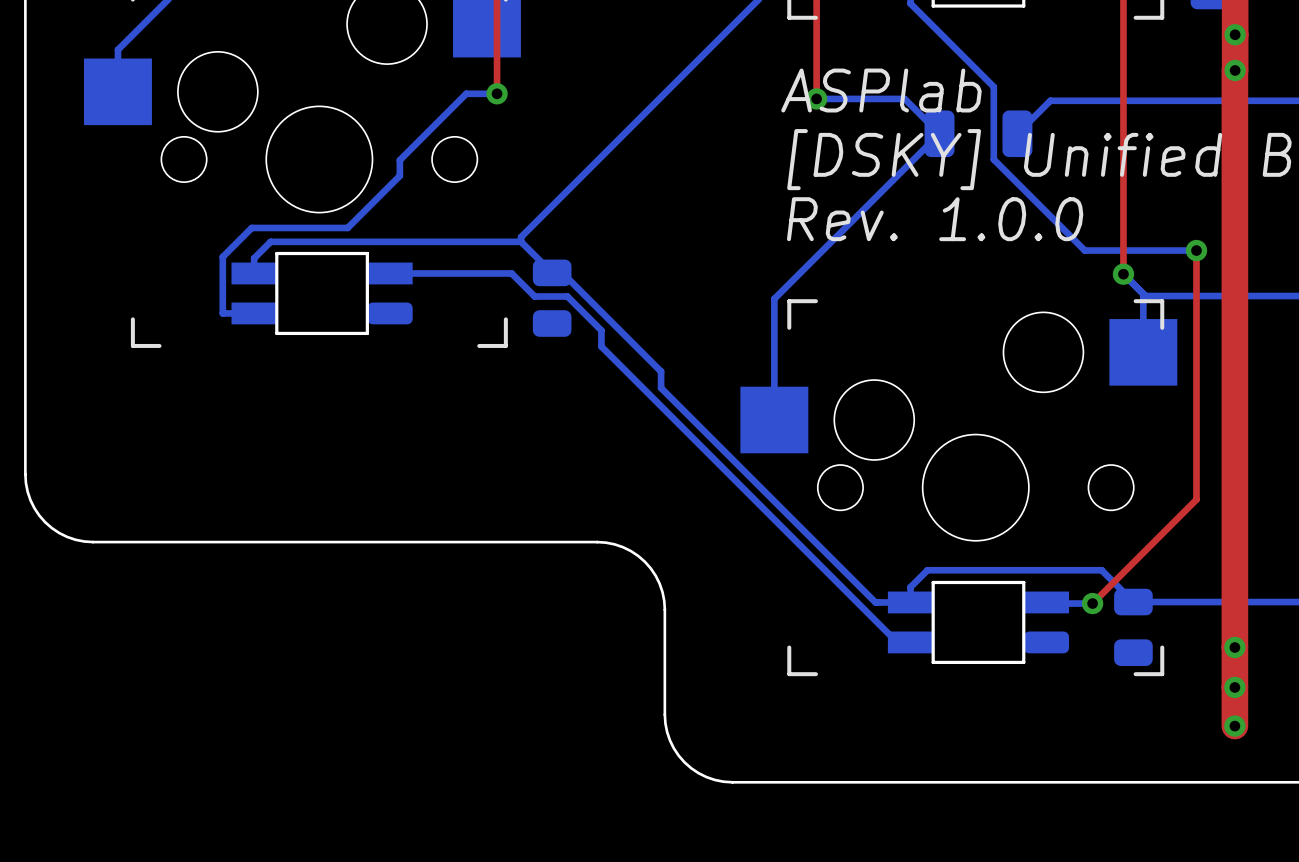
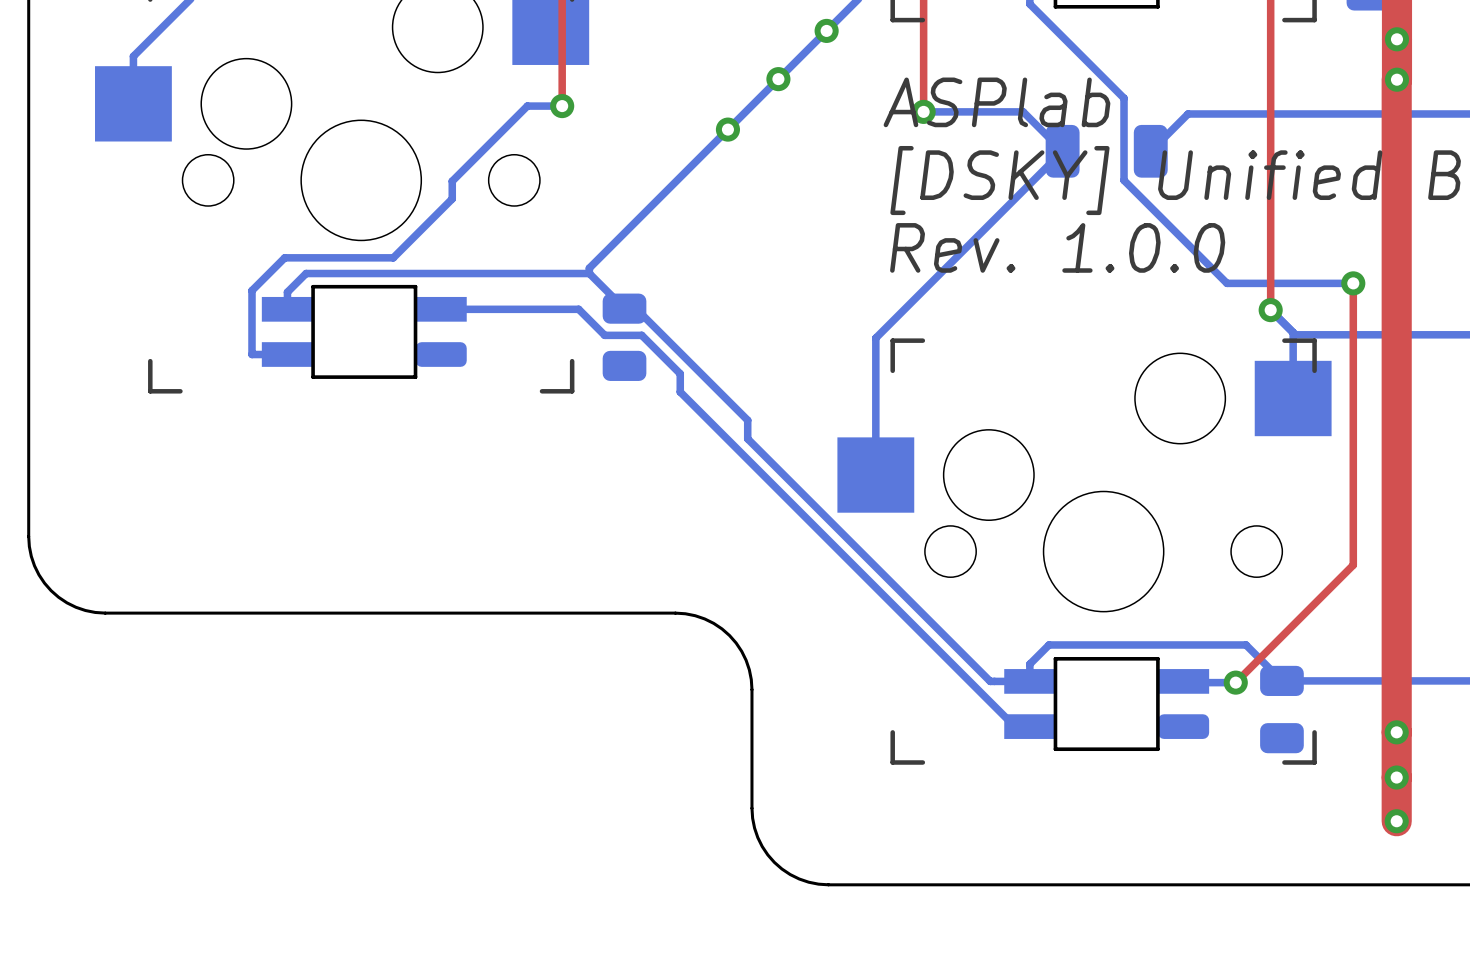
via: none -> (826, 30)
via: none -> (778, 79)
via: none -> (727, 129)

